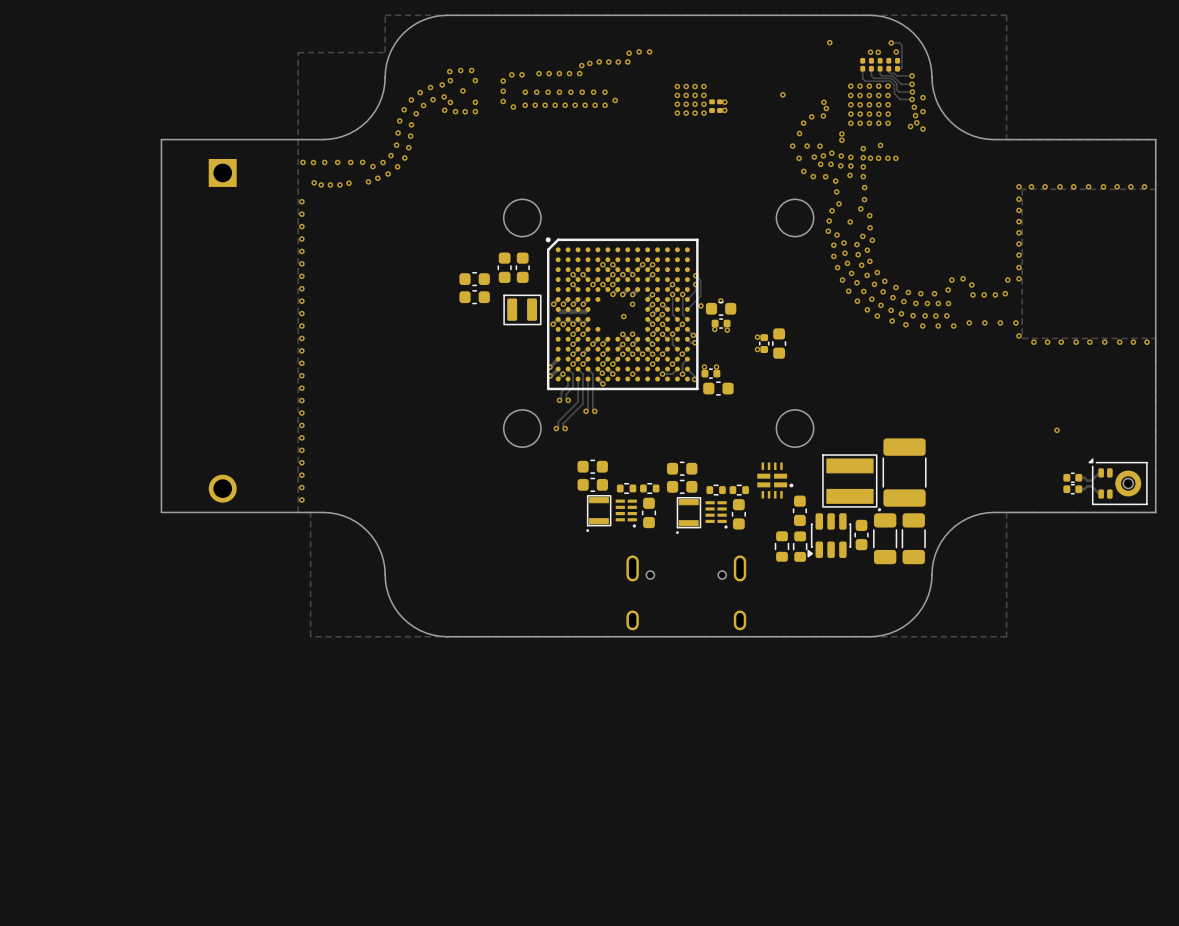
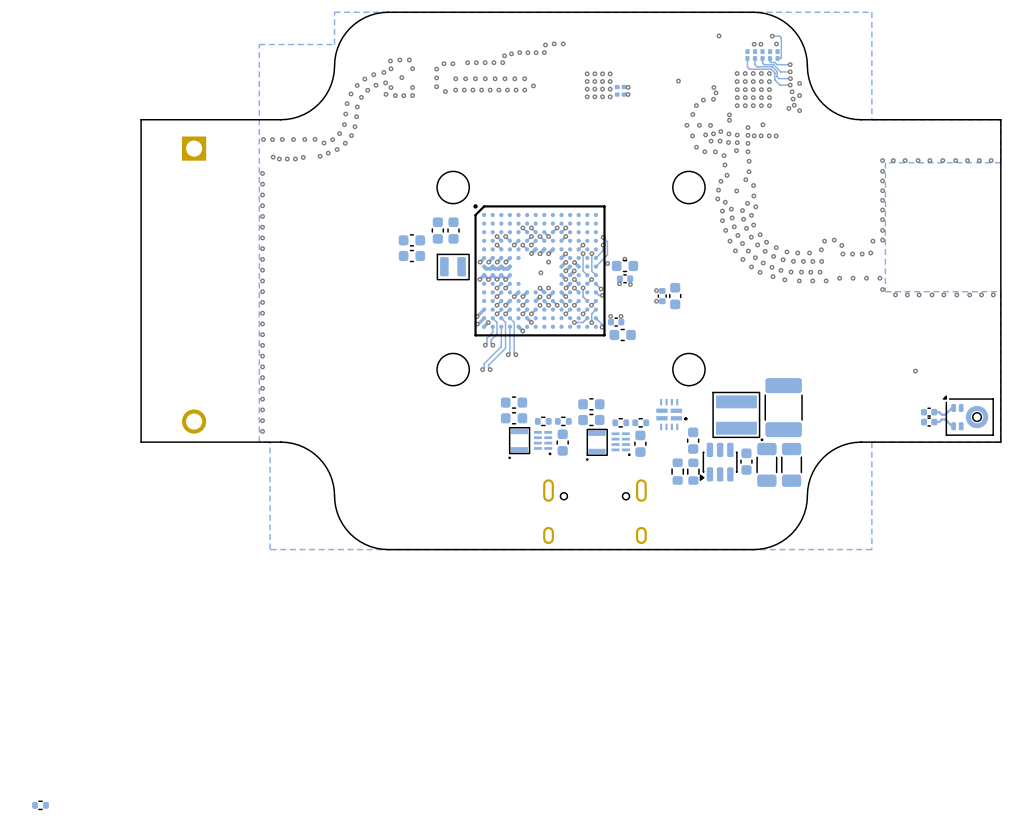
via: (602, 373) -> none
via: (632, 374) -> none

